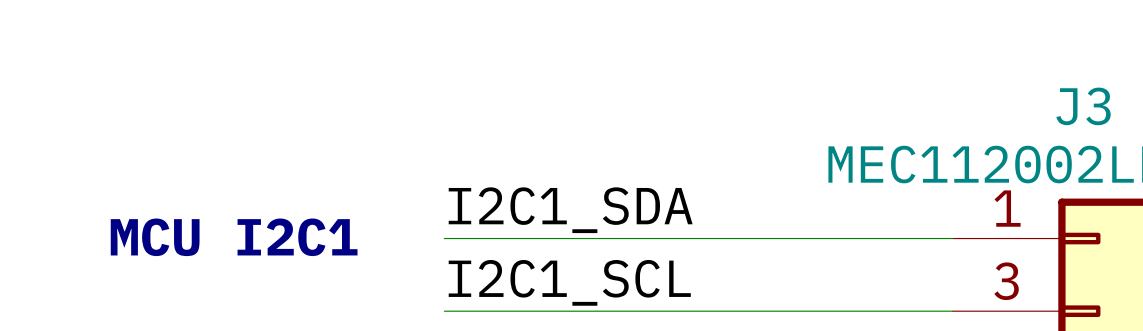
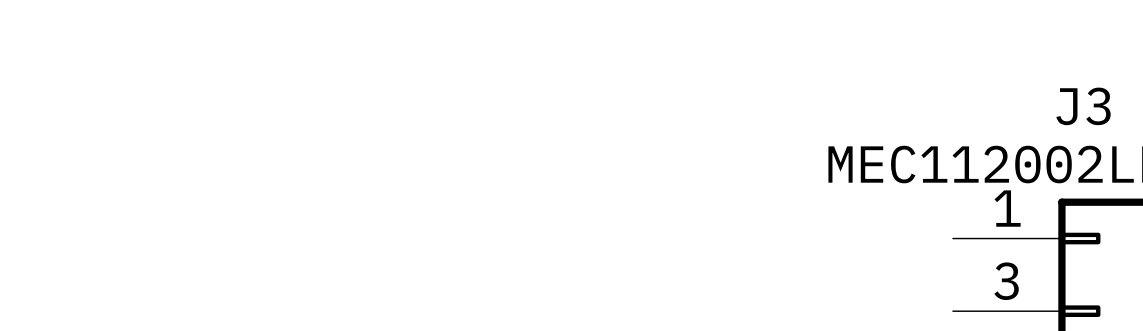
label: I2C1_SDA (570, 210) -> none
text: MCU I2C1 (234, 237) -> none
wire: (444, 238) (952, 238) -> none
label: I2C1_SCL (569, 282) -> none
wire: (444, 311) (952, 311) -> none

